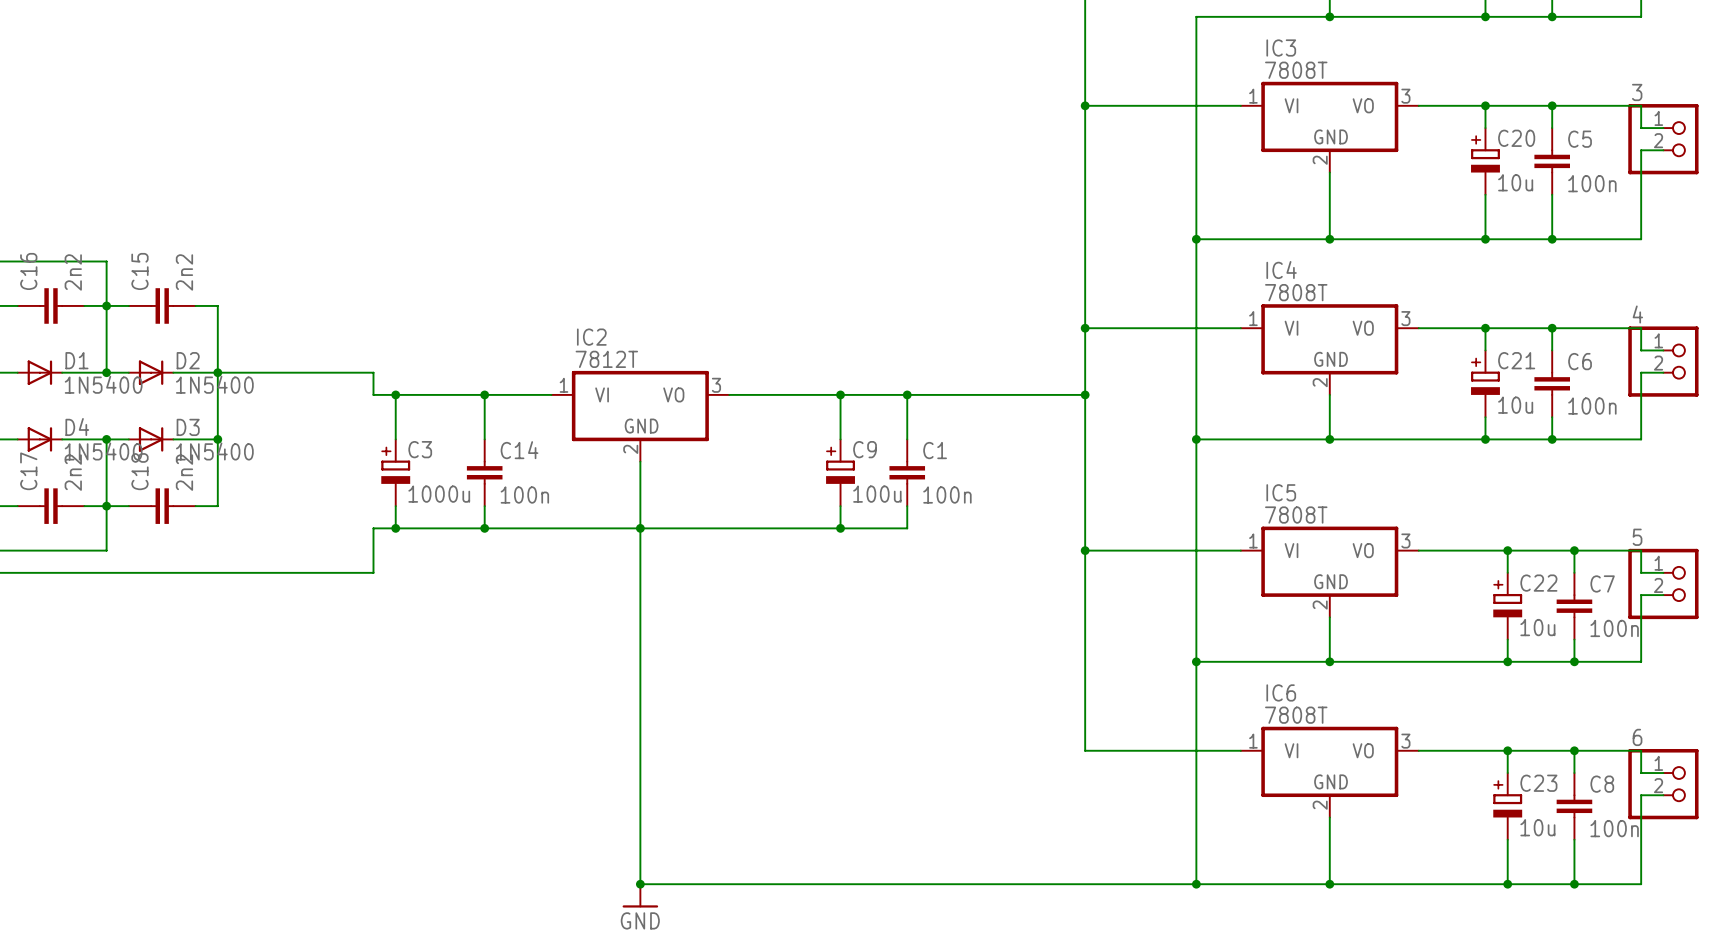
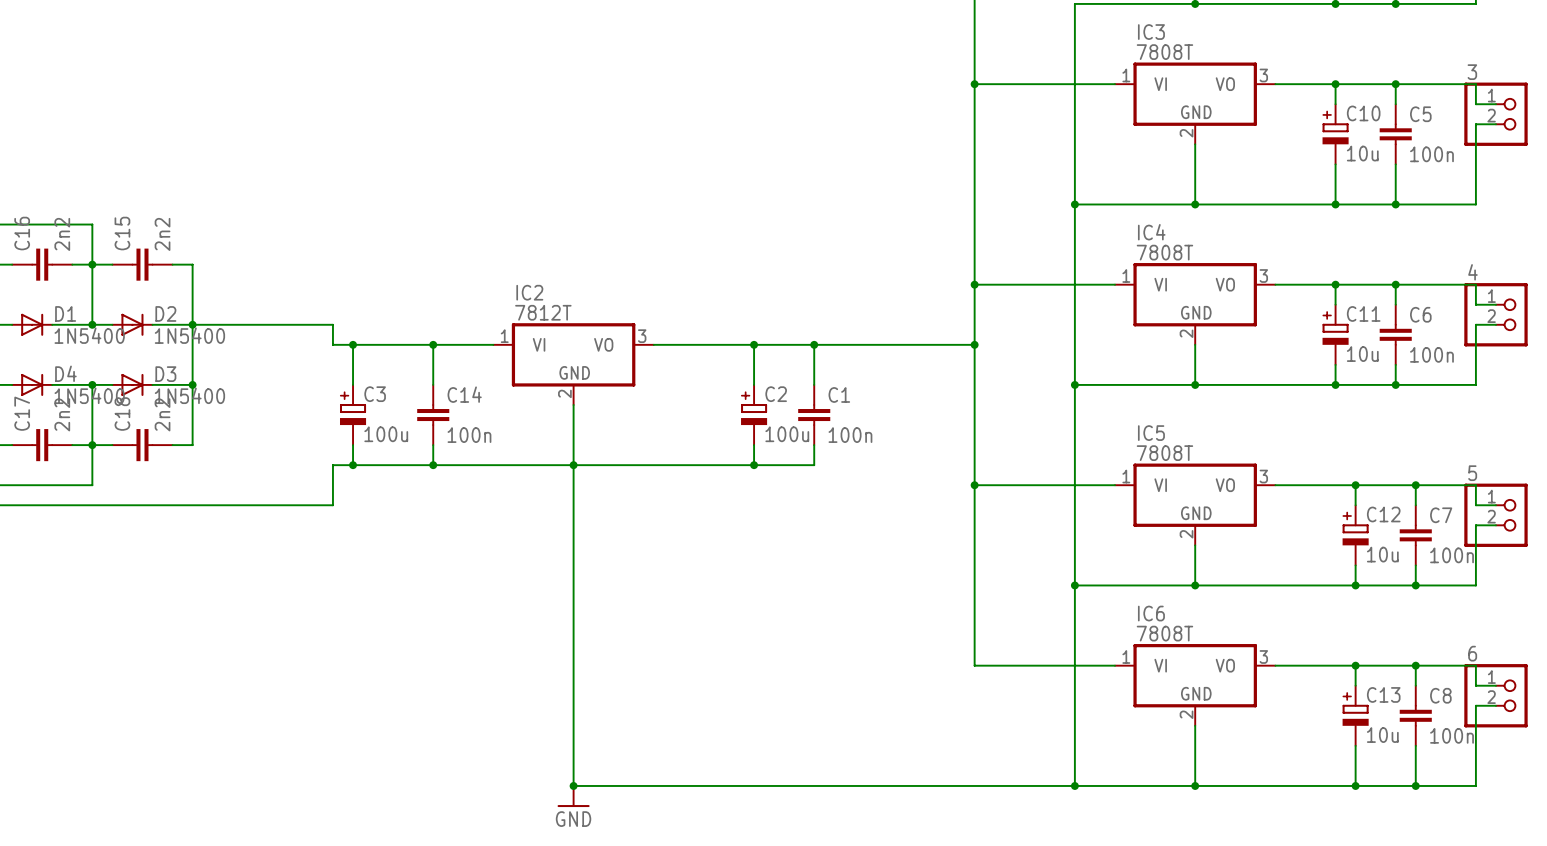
C20 name: C20 (1516, 138) -> C10 (1363, 113)
C21 name: C21 (1516, 360) -> C11 (1363, 313)
C9 name: C9 (865, 449) -> C2 (776, 394)
C3 value: 1000u (439, 494) -> 100u (386, 434)
C22 name: C22 (1538, 583) -> C12 (1383, 514)
C23 name: C23 (1538, 783) -> C13 (1383, 694)

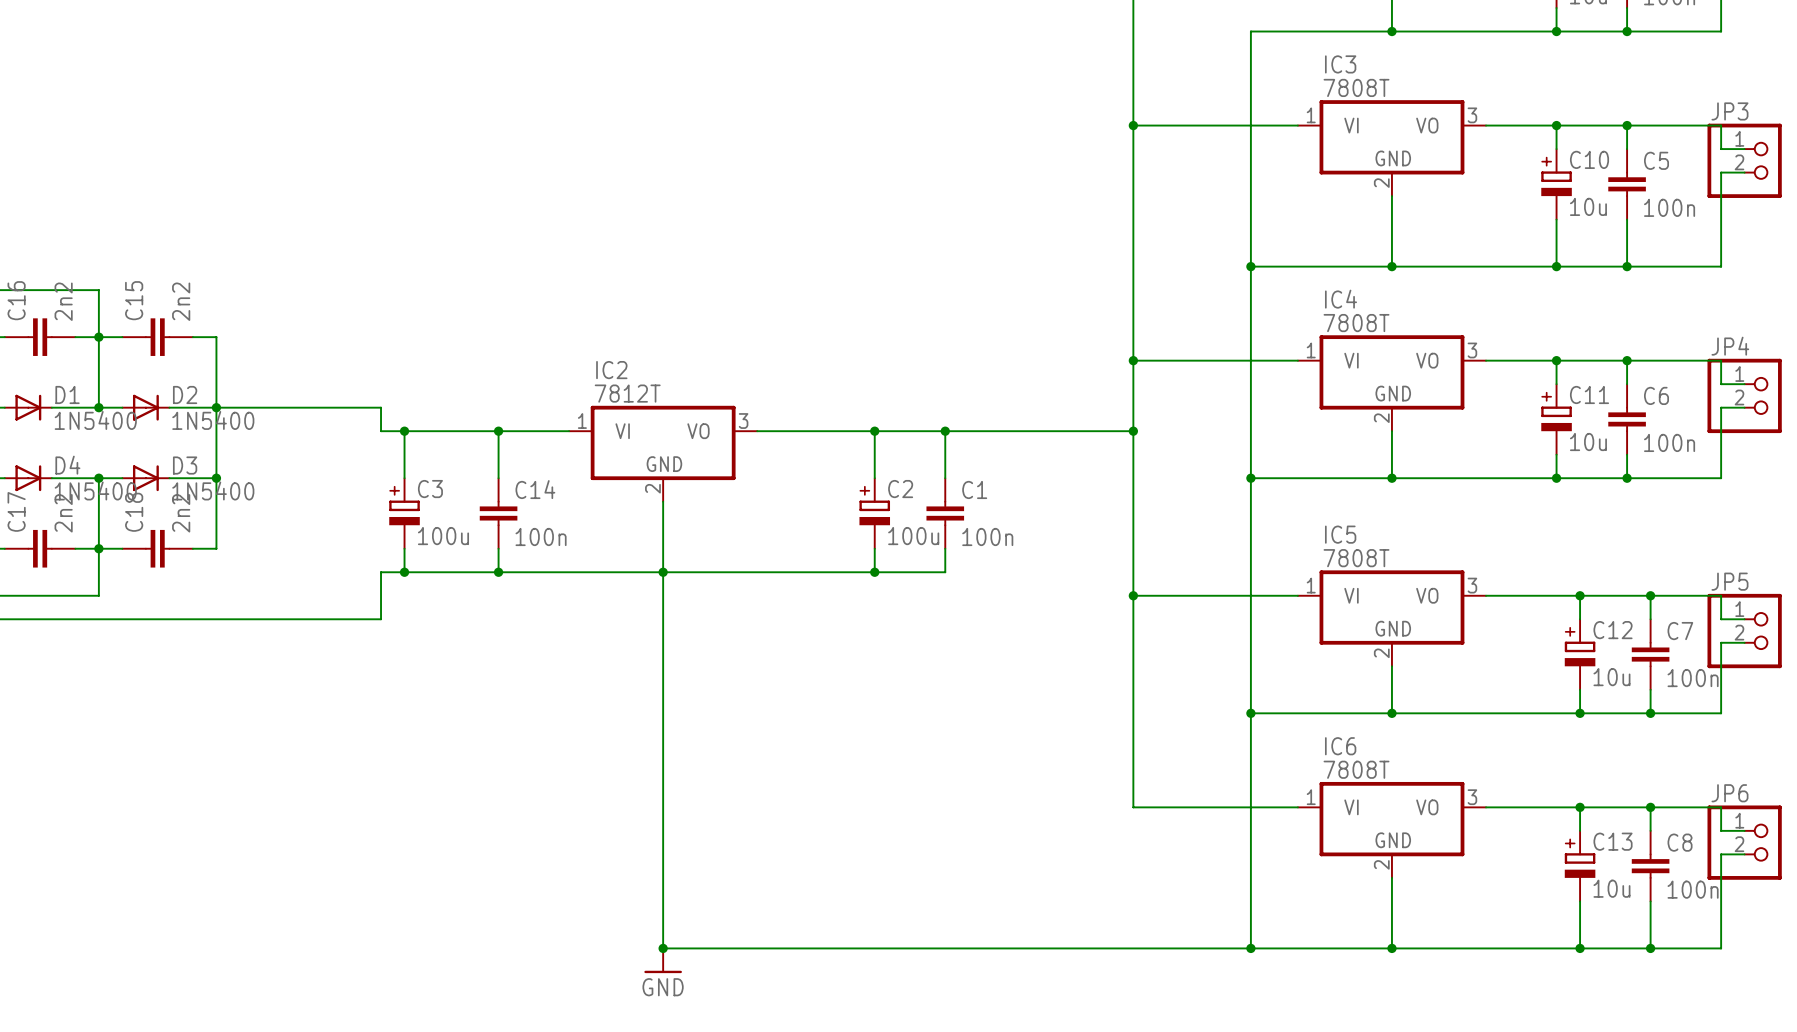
3 name: 3 (1472, 72) -> JP3 (1729, 111)
4 name: 4 (1472, 272) -> JP4 (1730, 346)
5 name: 5 (1472, 473) -> JP5 (1729, 581)
6 name: 6 (1472, 653) -> JP6 (1729, 793)

